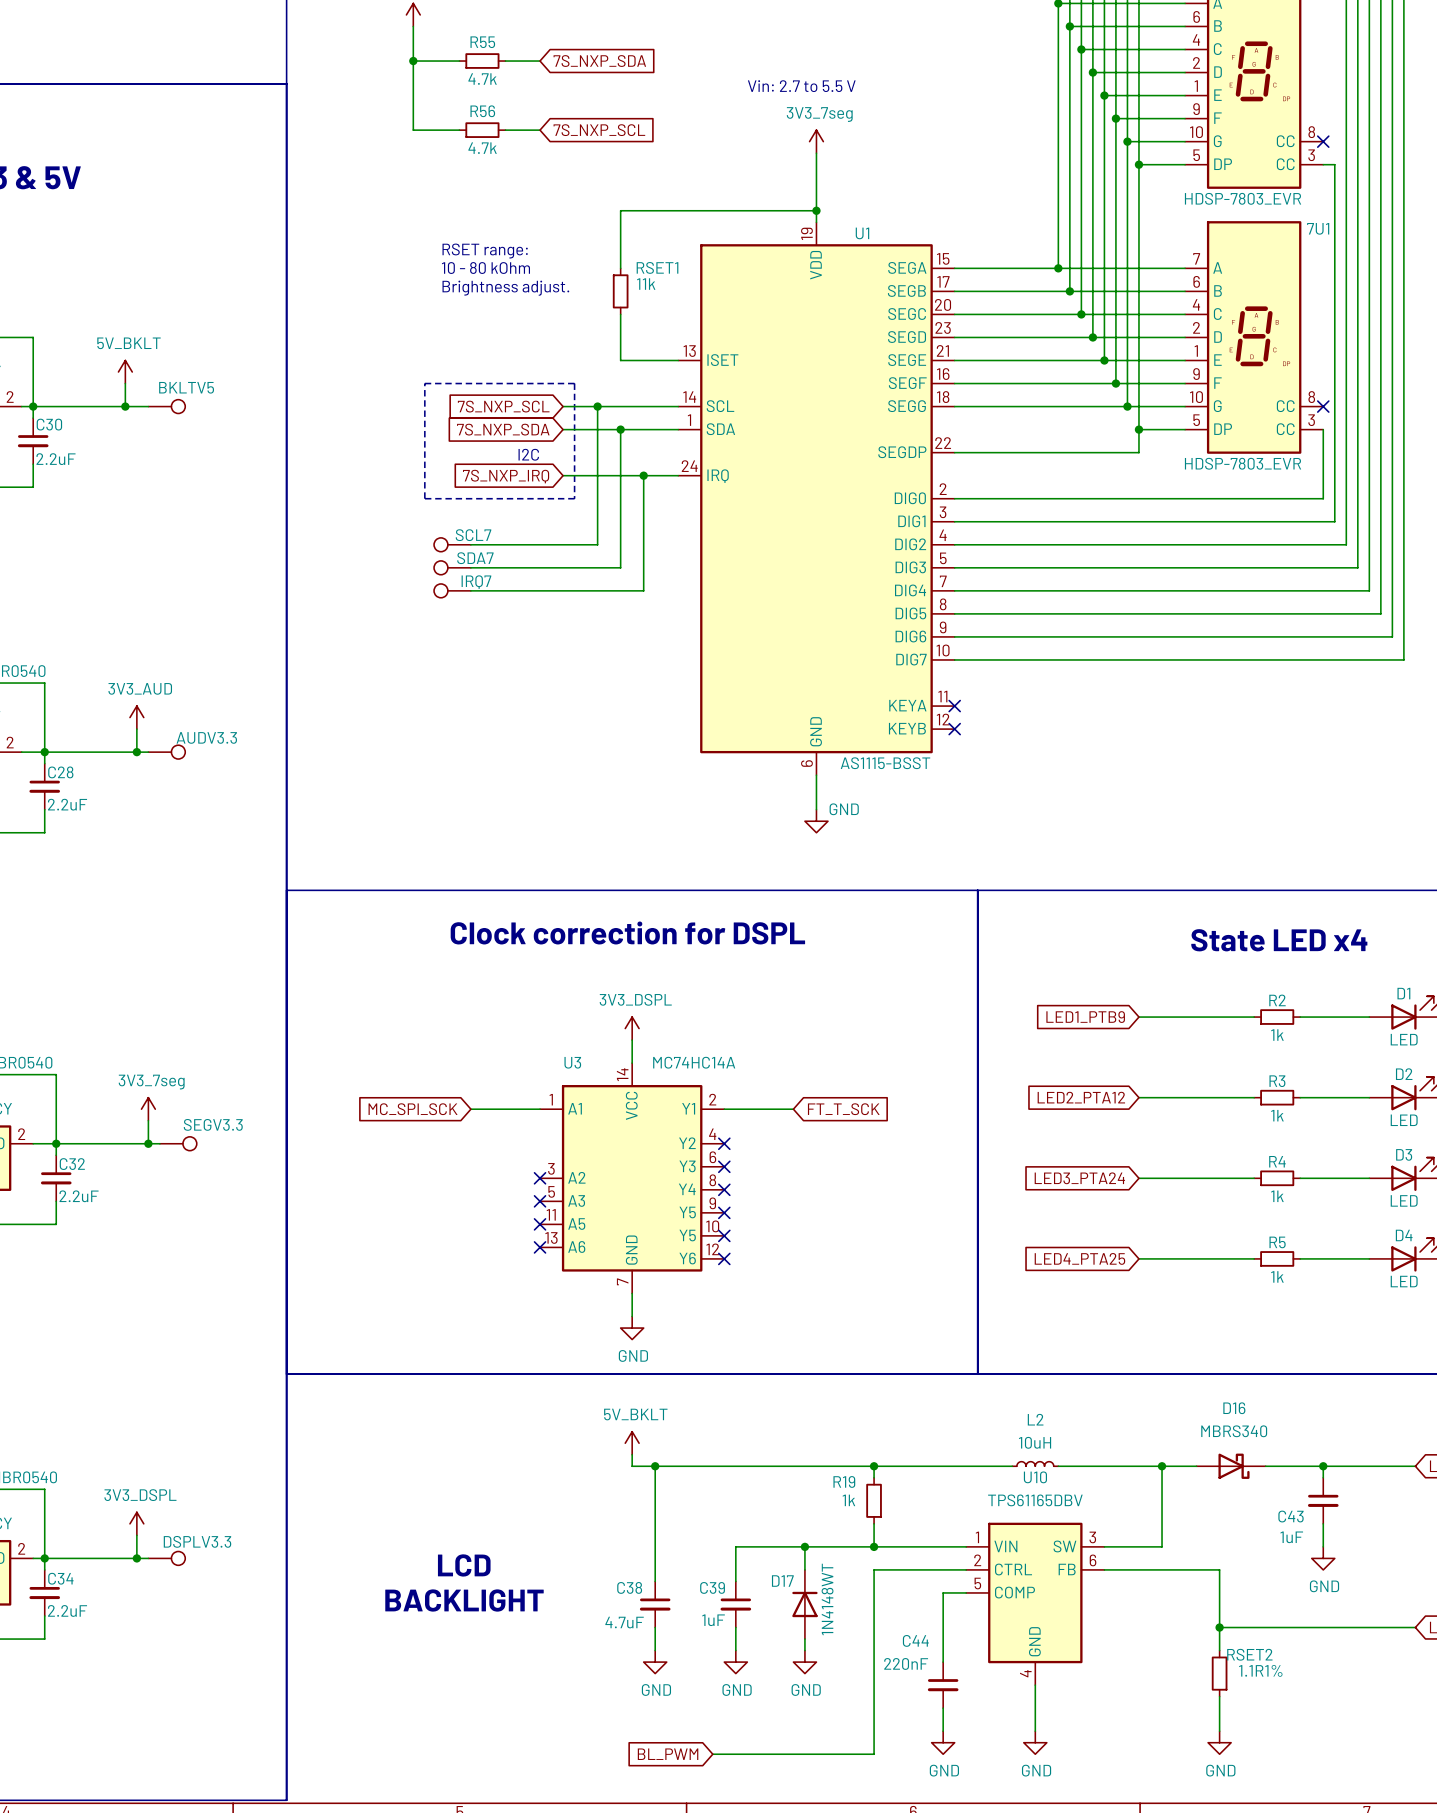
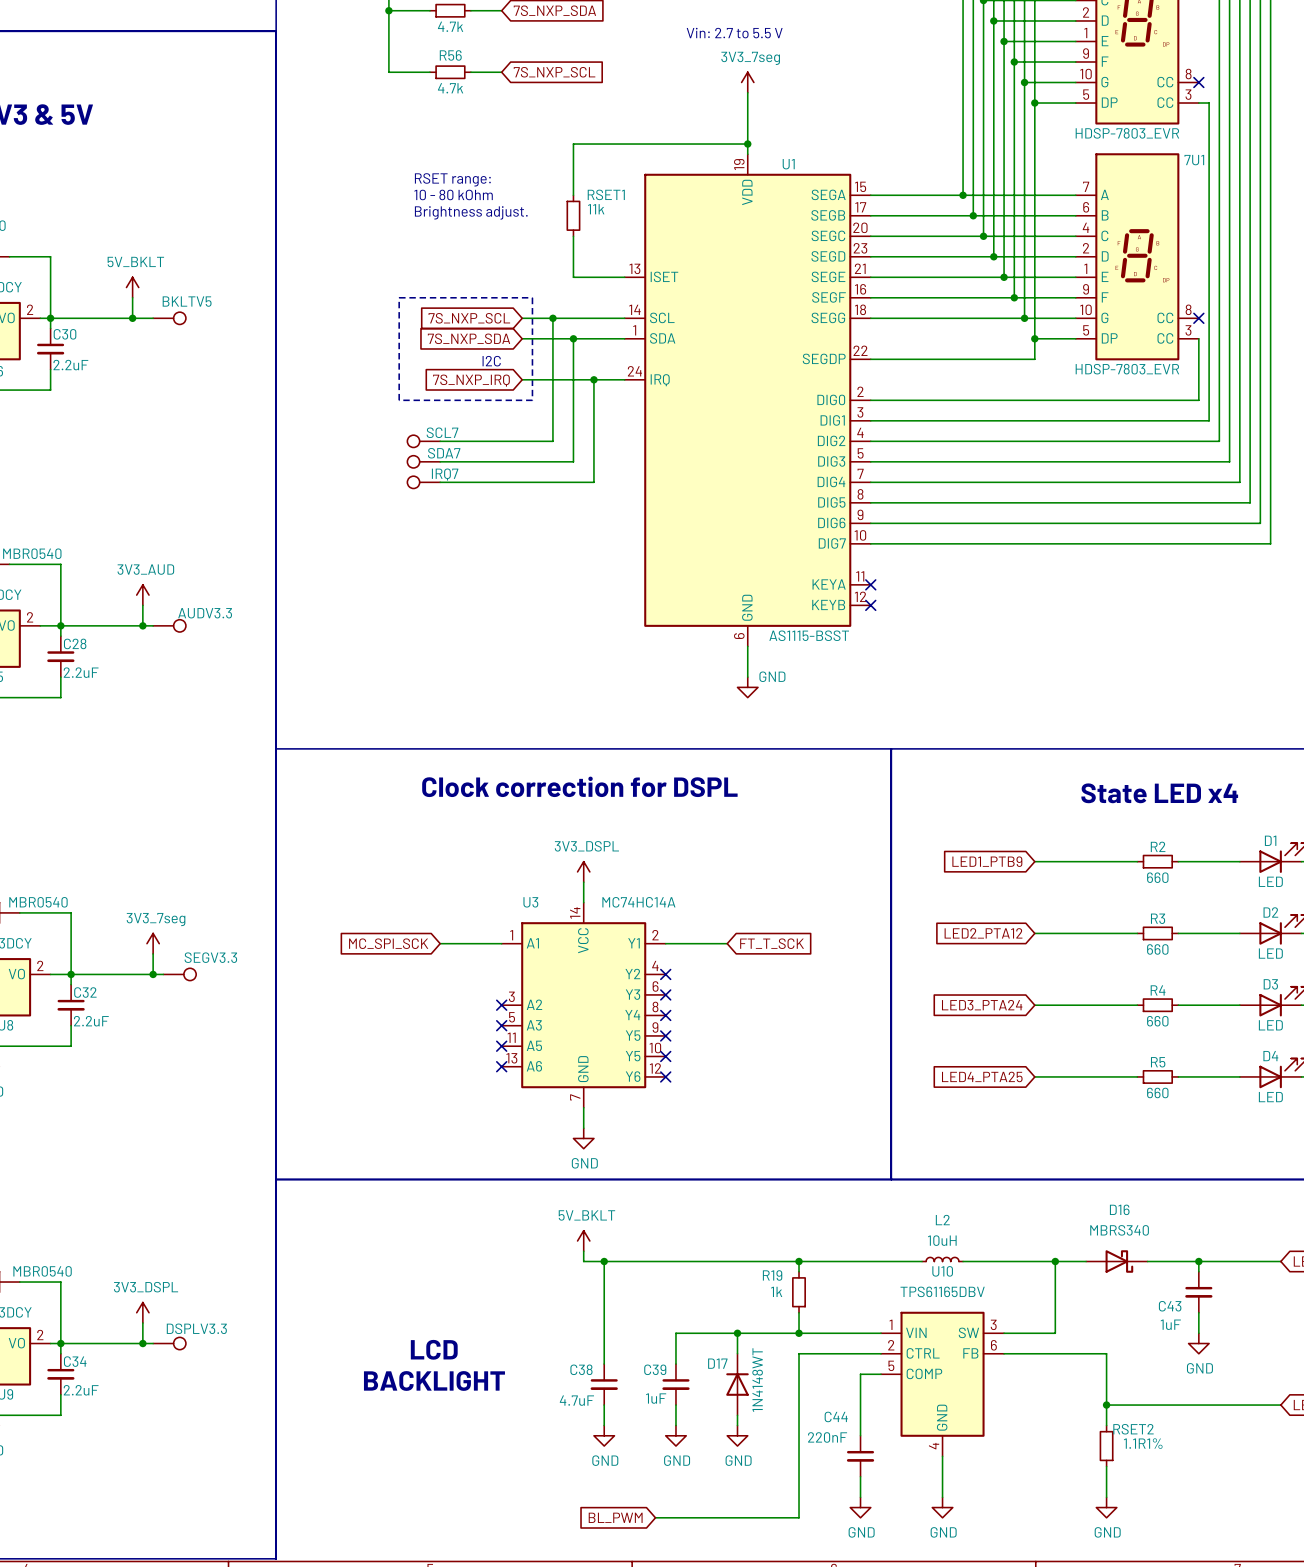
R2 value: 1k (1277, 1035) -> 660 (1157, 877)
R3 value: 1k (1277, 1115) -> 660 (1157, 949)
R4 value: 1k (1277, 1196) -> 660 (1157, 1021)
R5 value: 1k (1277, 1276) -> 660 (1157, 1092)

